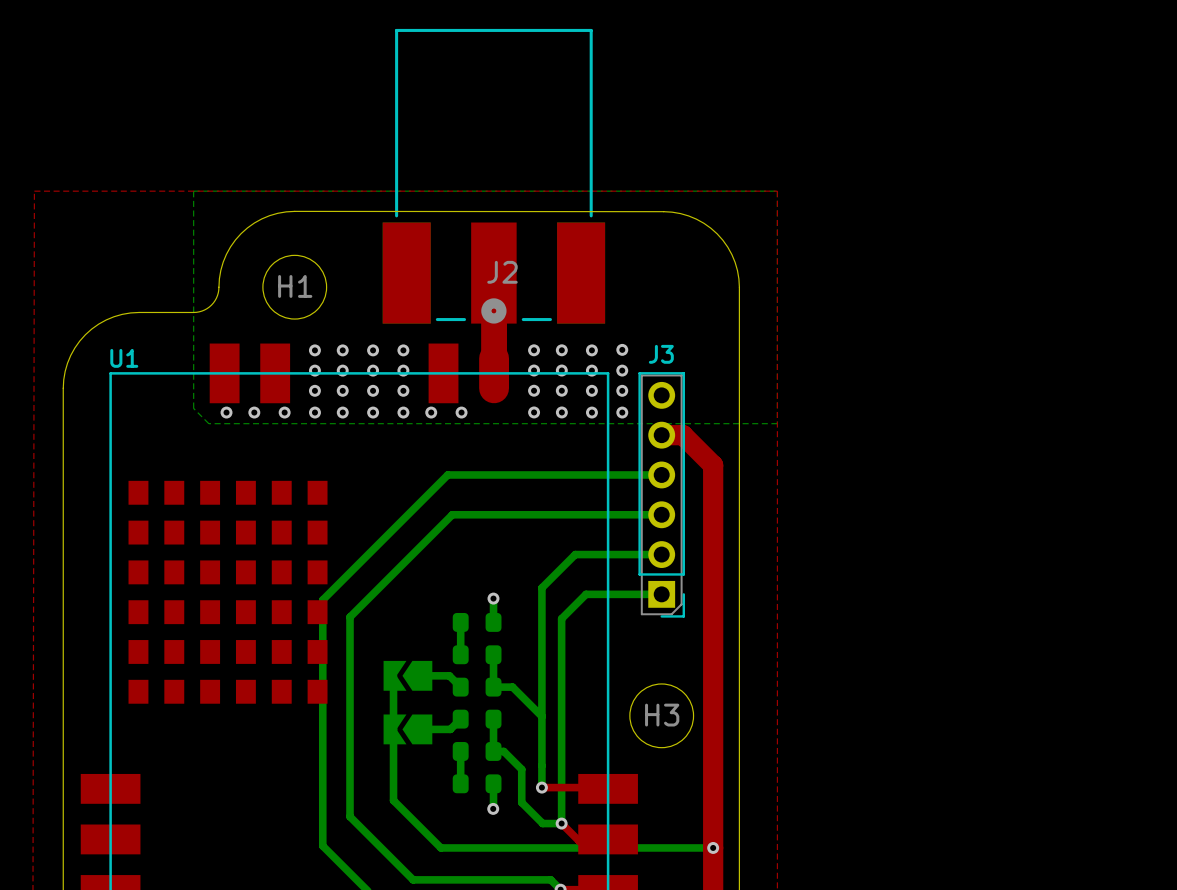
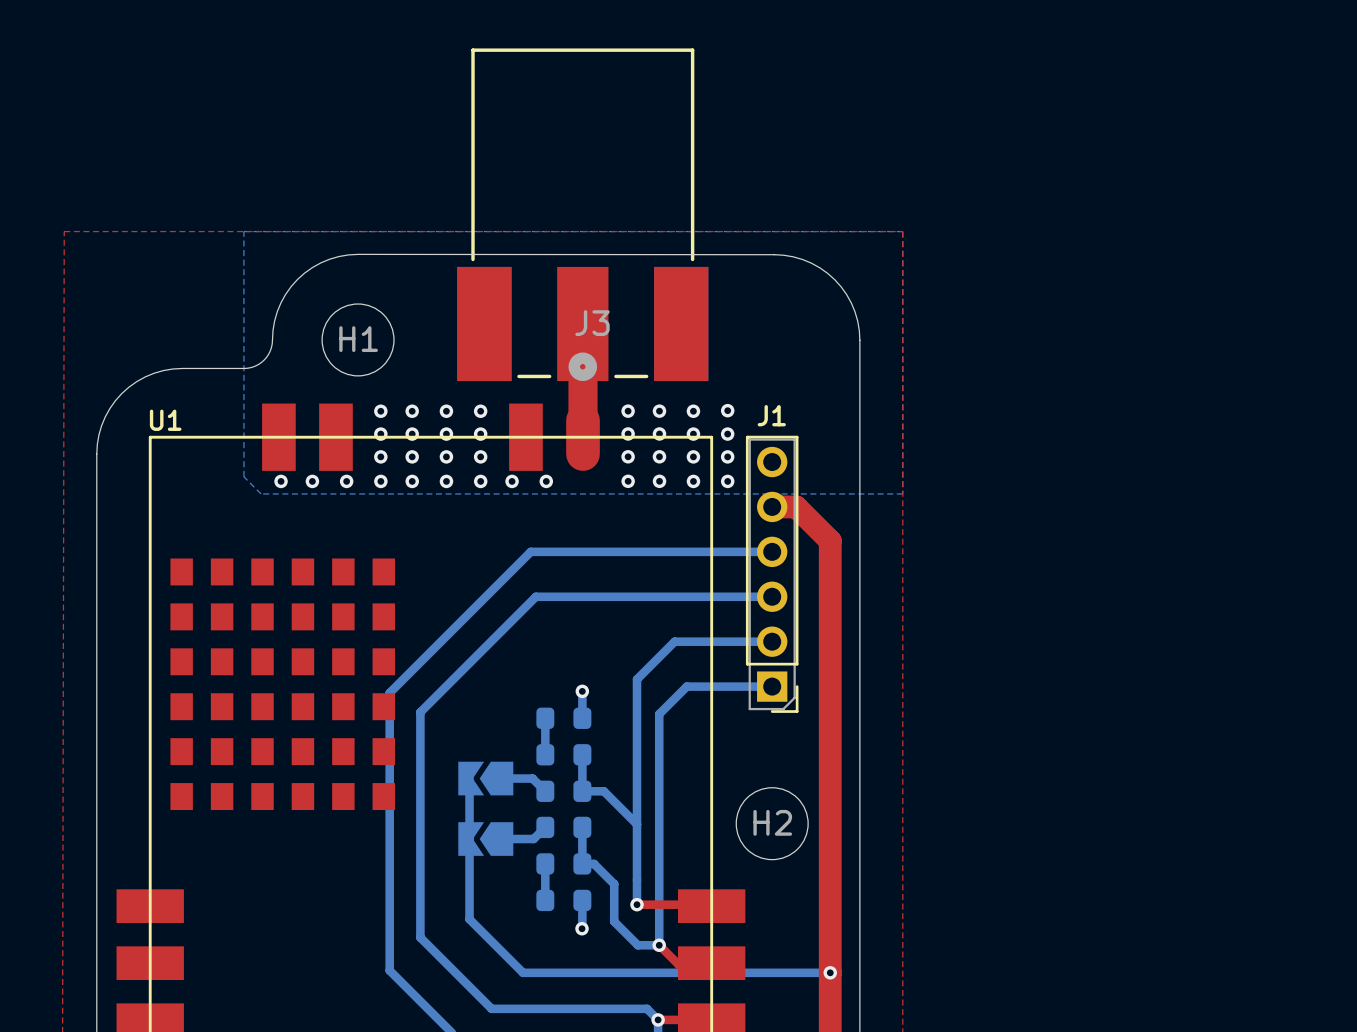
J2 name: J2 (502, 272) -> J3 (592, 323)
J3 name: J3 (661, 354) -> J1 (771, 415)
H3 name: H3 (662, 715) -> H2 (772, 822)

